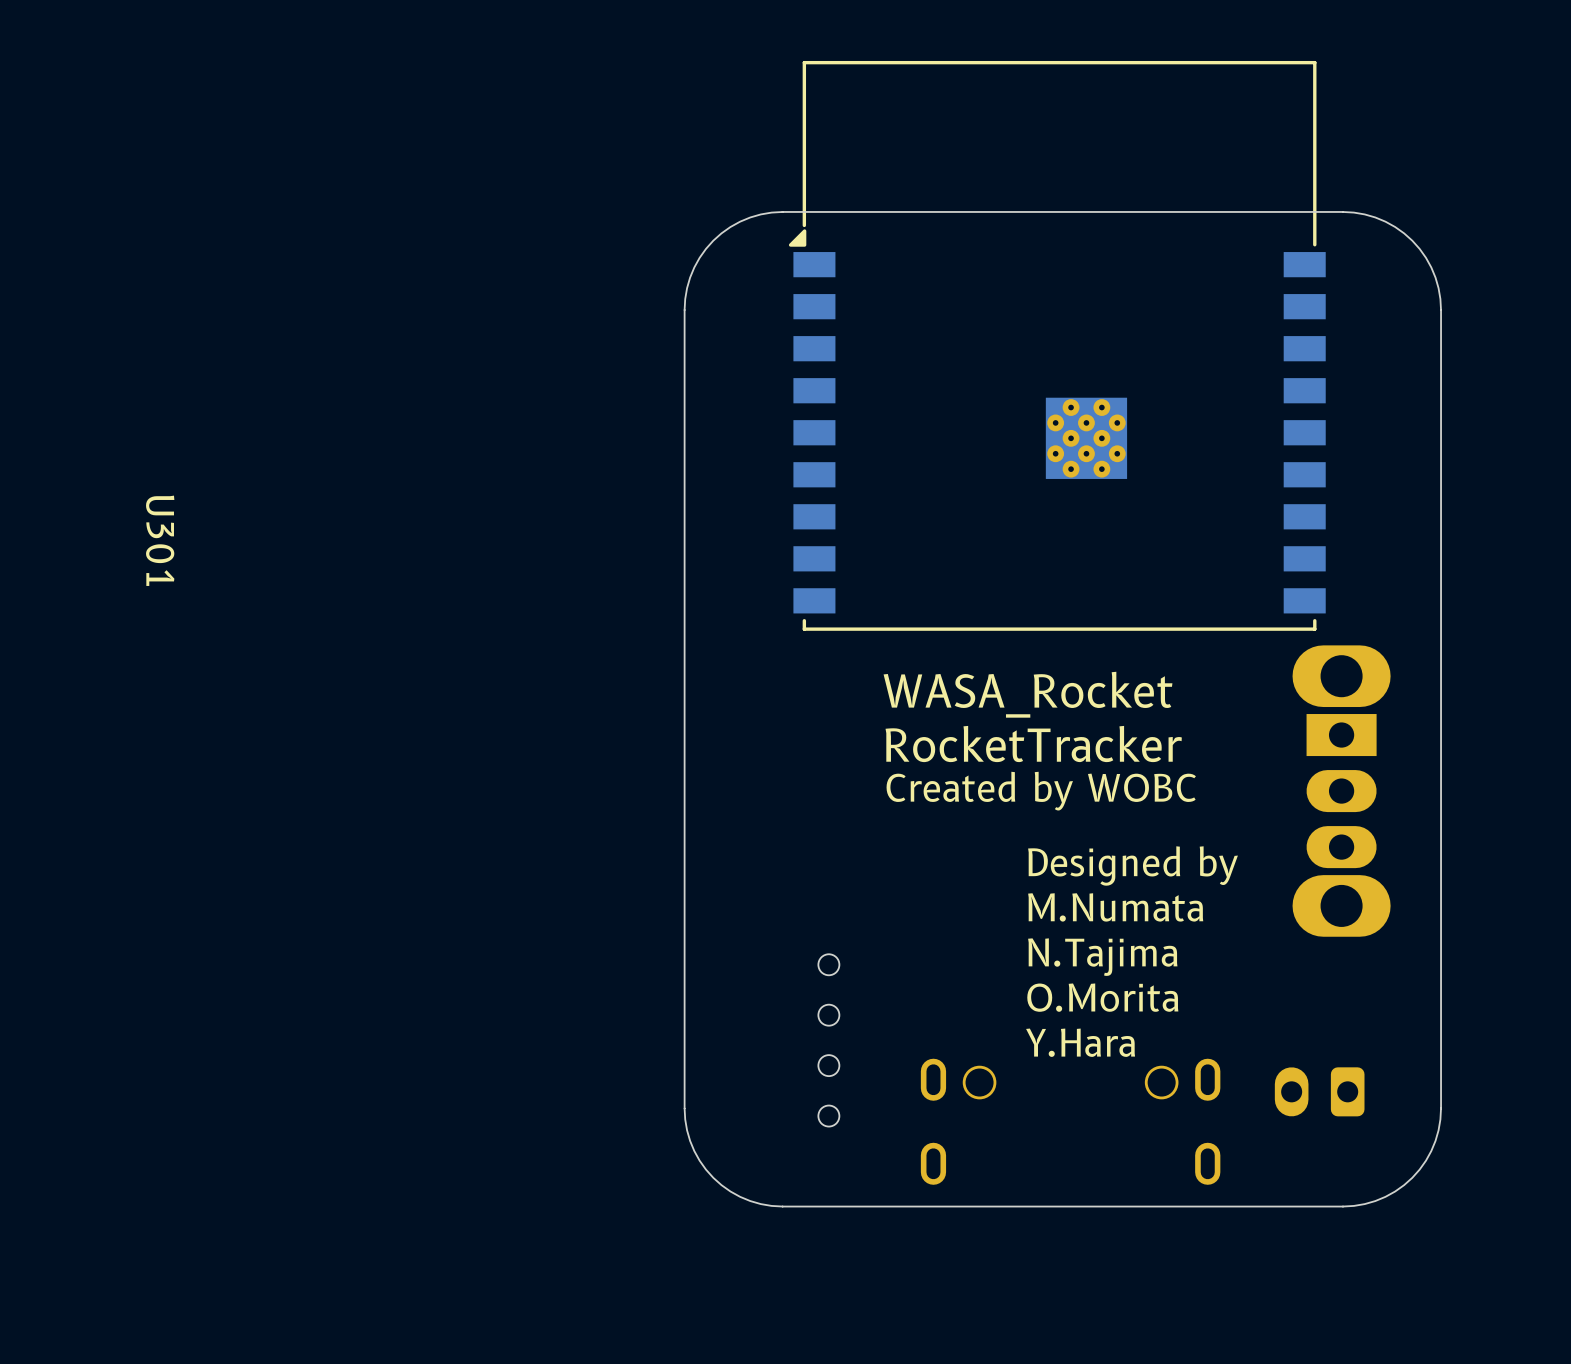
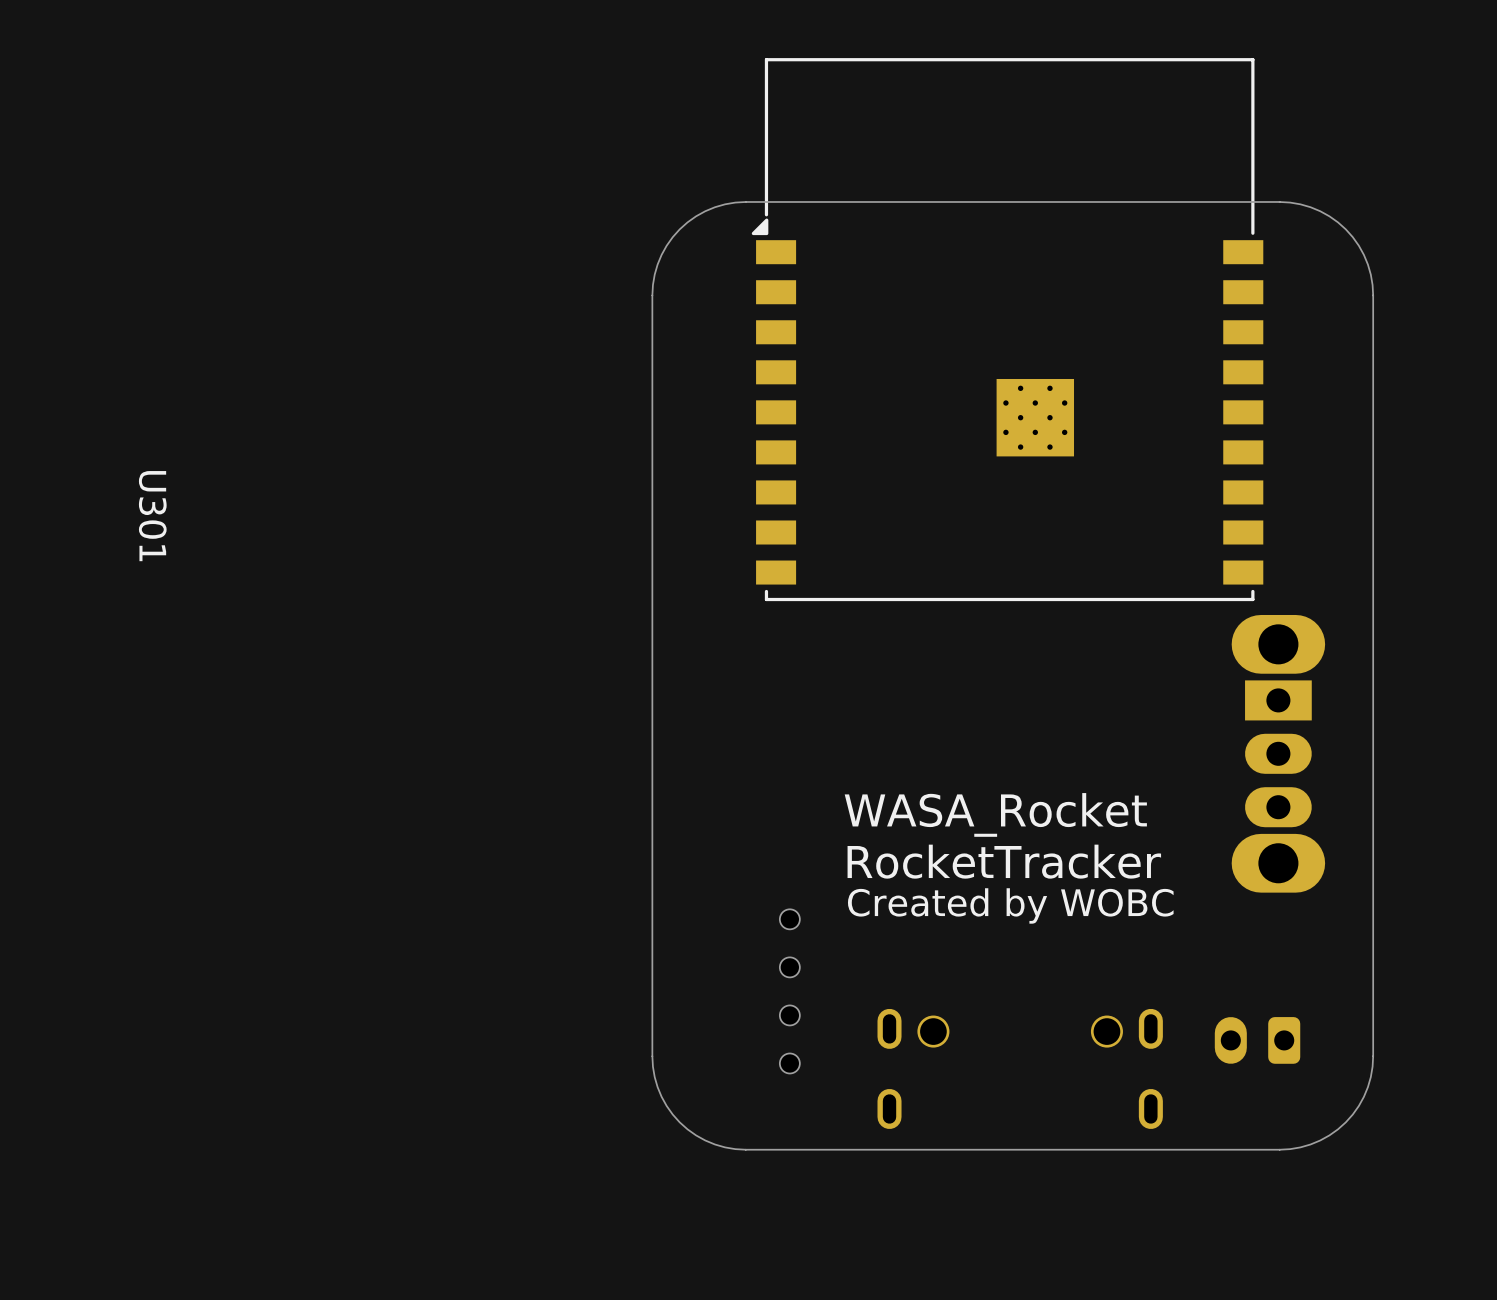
text position: WASA_Rocket (1028, 694) -> WASA_Rocket (995, 814)
text position: RocketTracker (1033, 744) -> RocketTracker (1004, 861)
text position: Created by WOBC (1041, 791) -> Created by WOBC (1010, 905)
text: Designed by (1133, 866) -> none
text: M.Numata (1115, 907) -> none
text: N.Tajima (1102, 957) -> none
text: O.Morita (1102, 997) -> none
text: Y.Hara (1080, 1042) -> none

